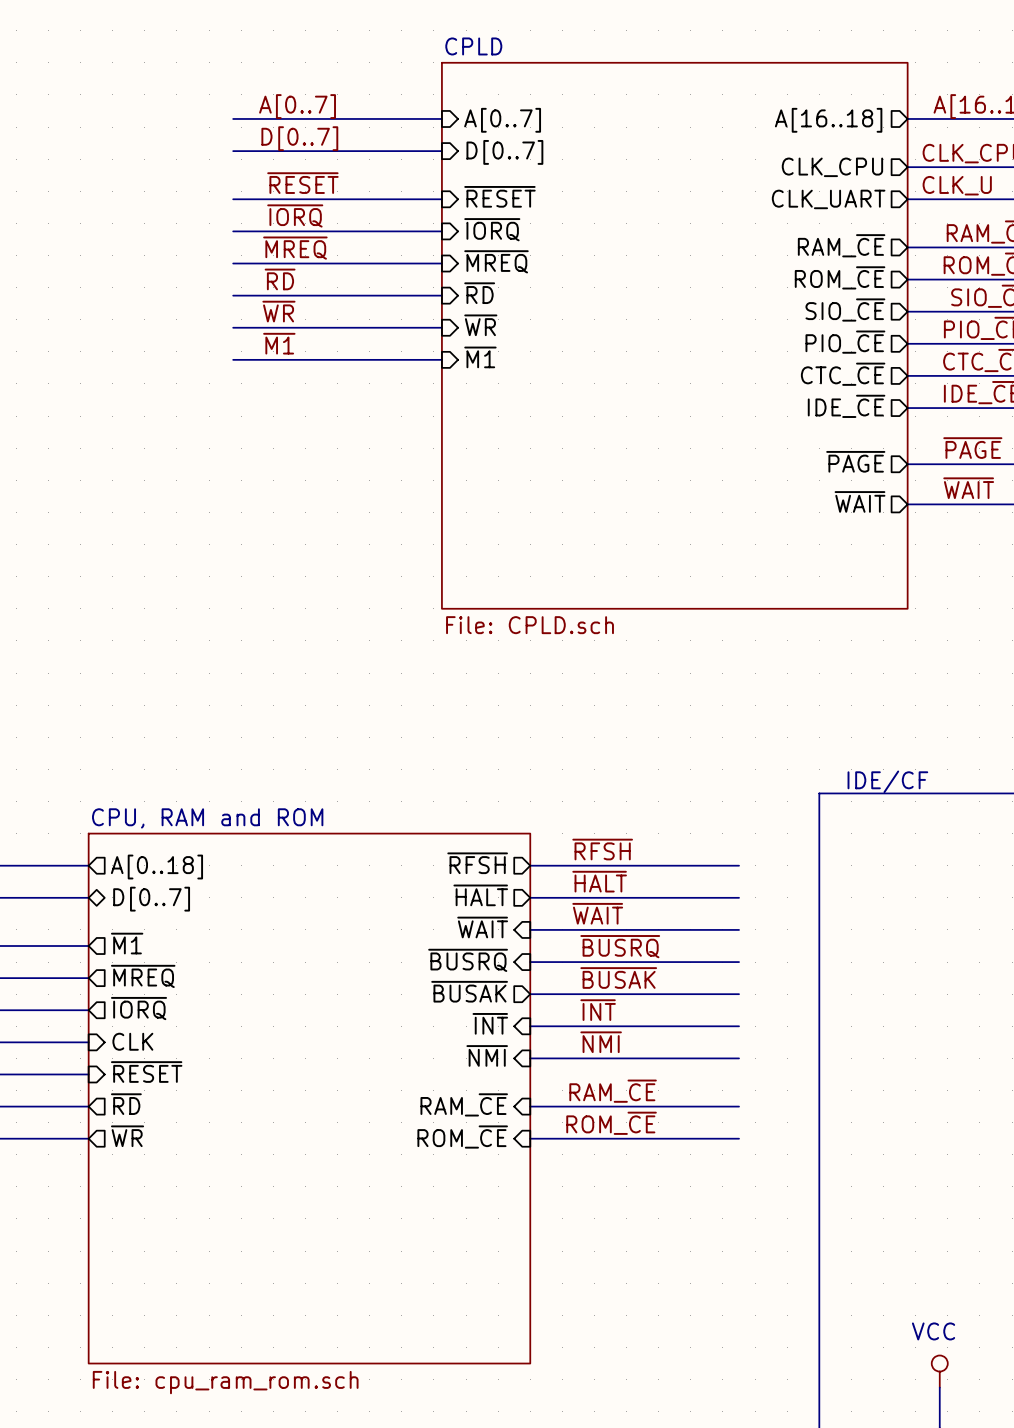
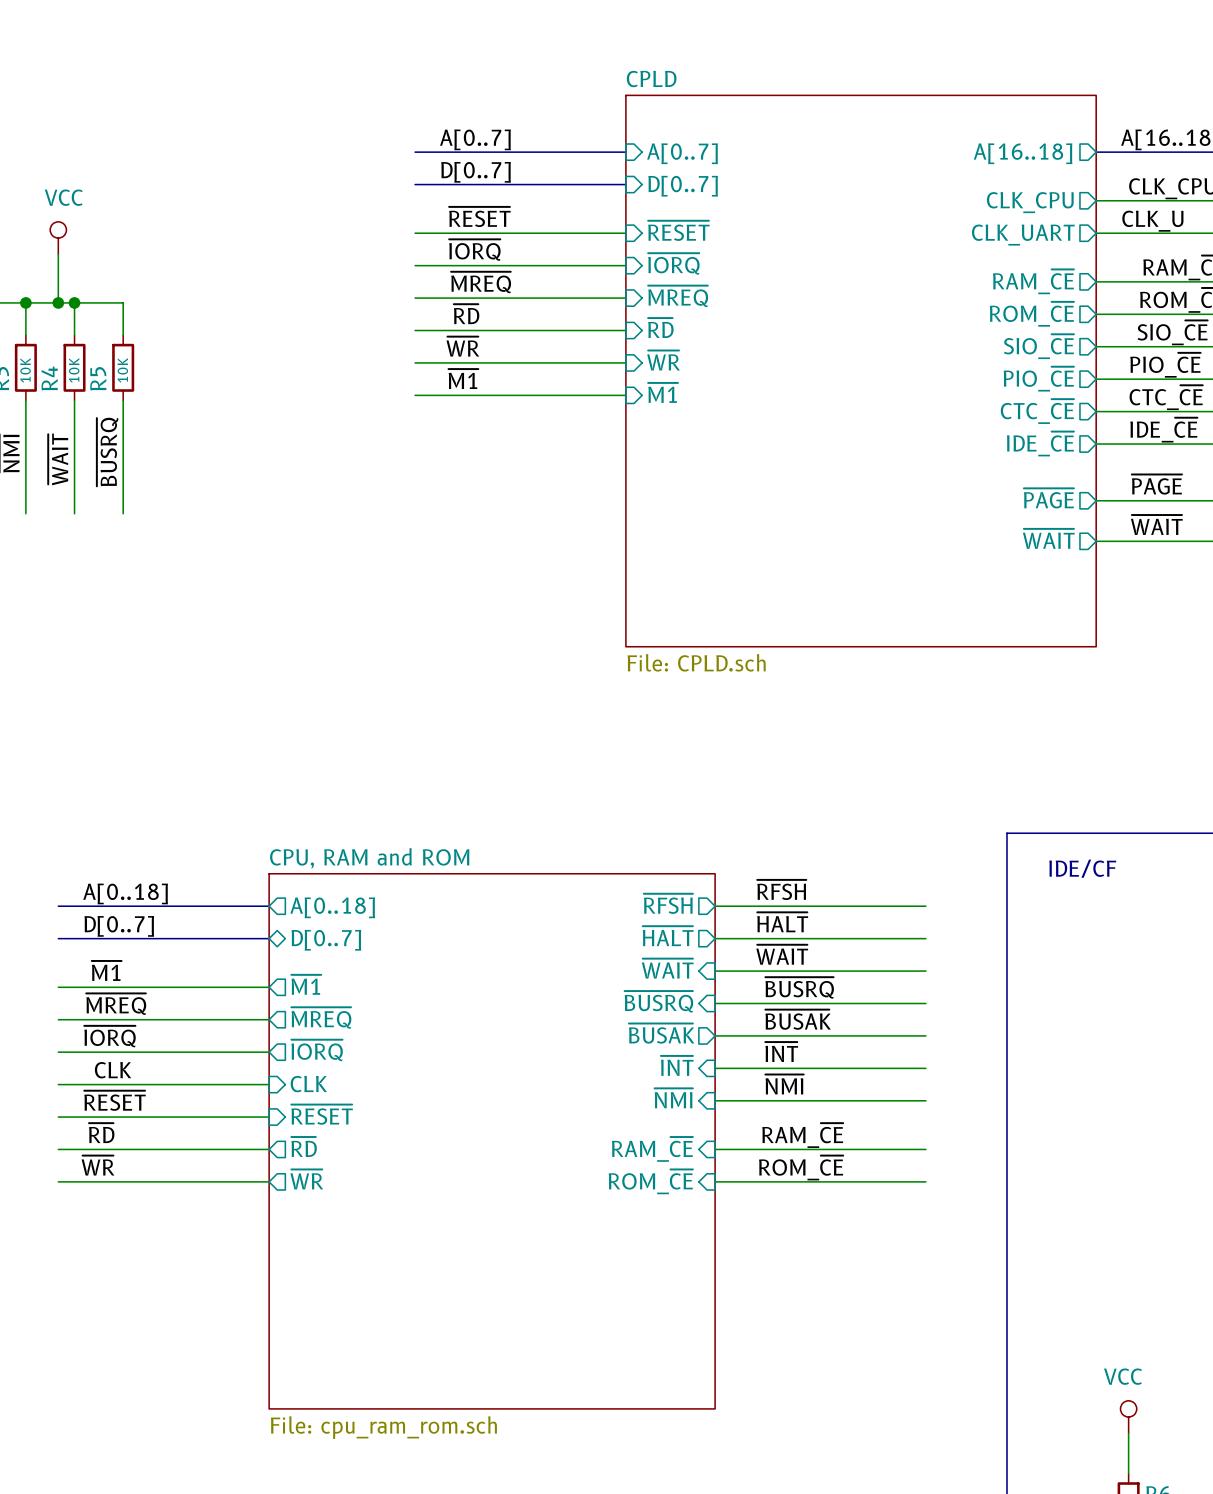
text position: IDE/CF (887, 781) -> IDE/CF (1082, 868)

